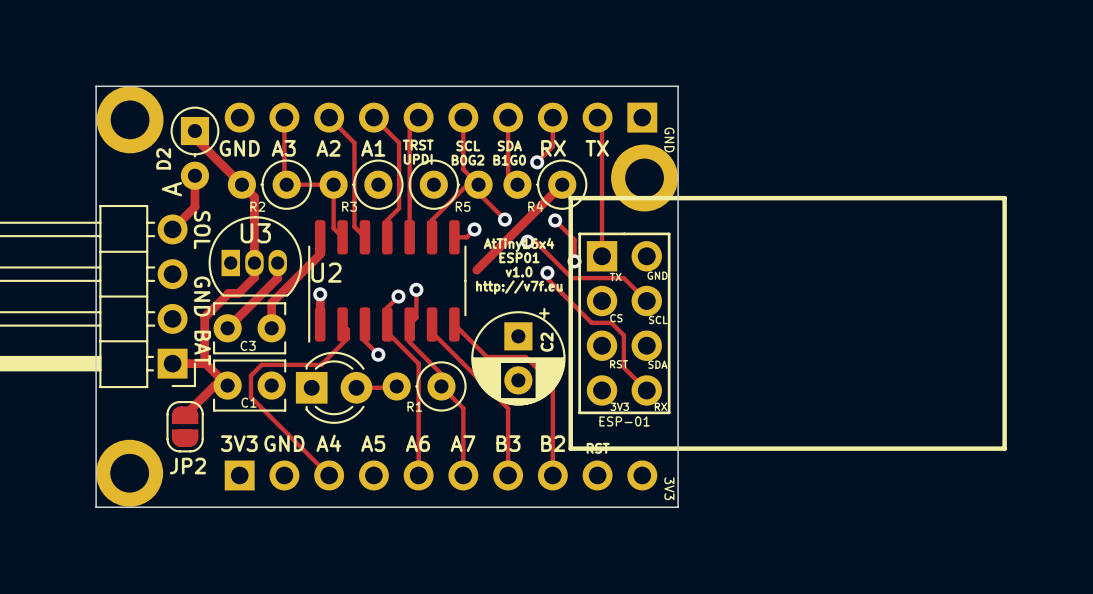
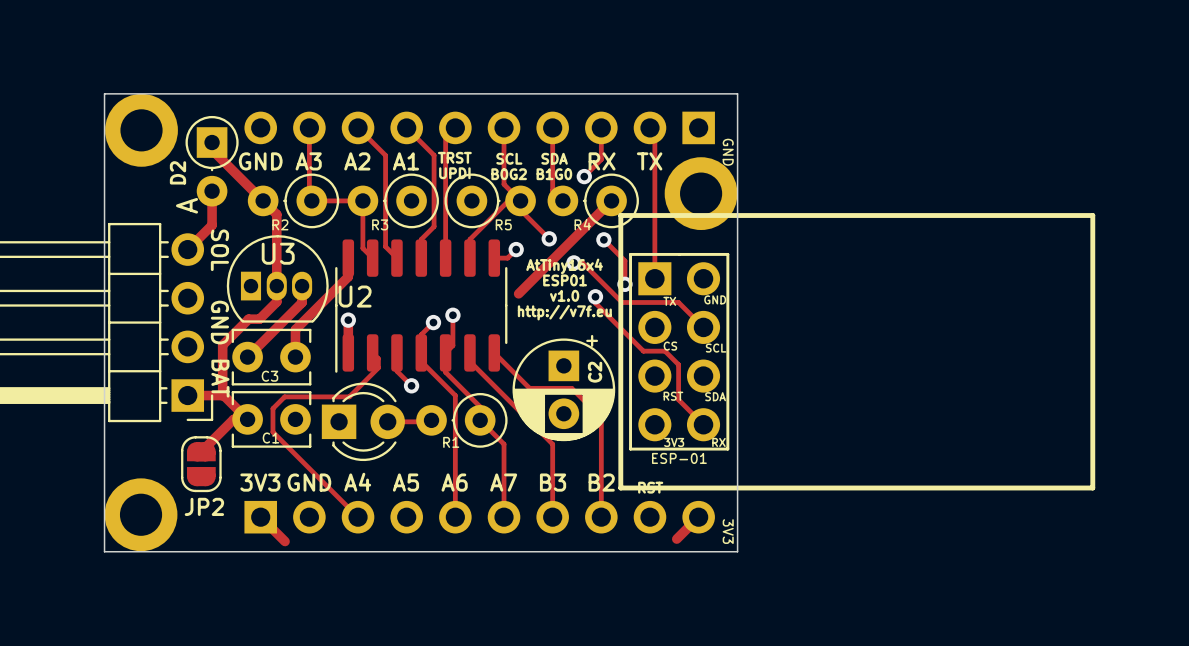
track: none -> (265, 517) (260, 517) (285, 541)
track: none -> (698, 517) (676, 539)

